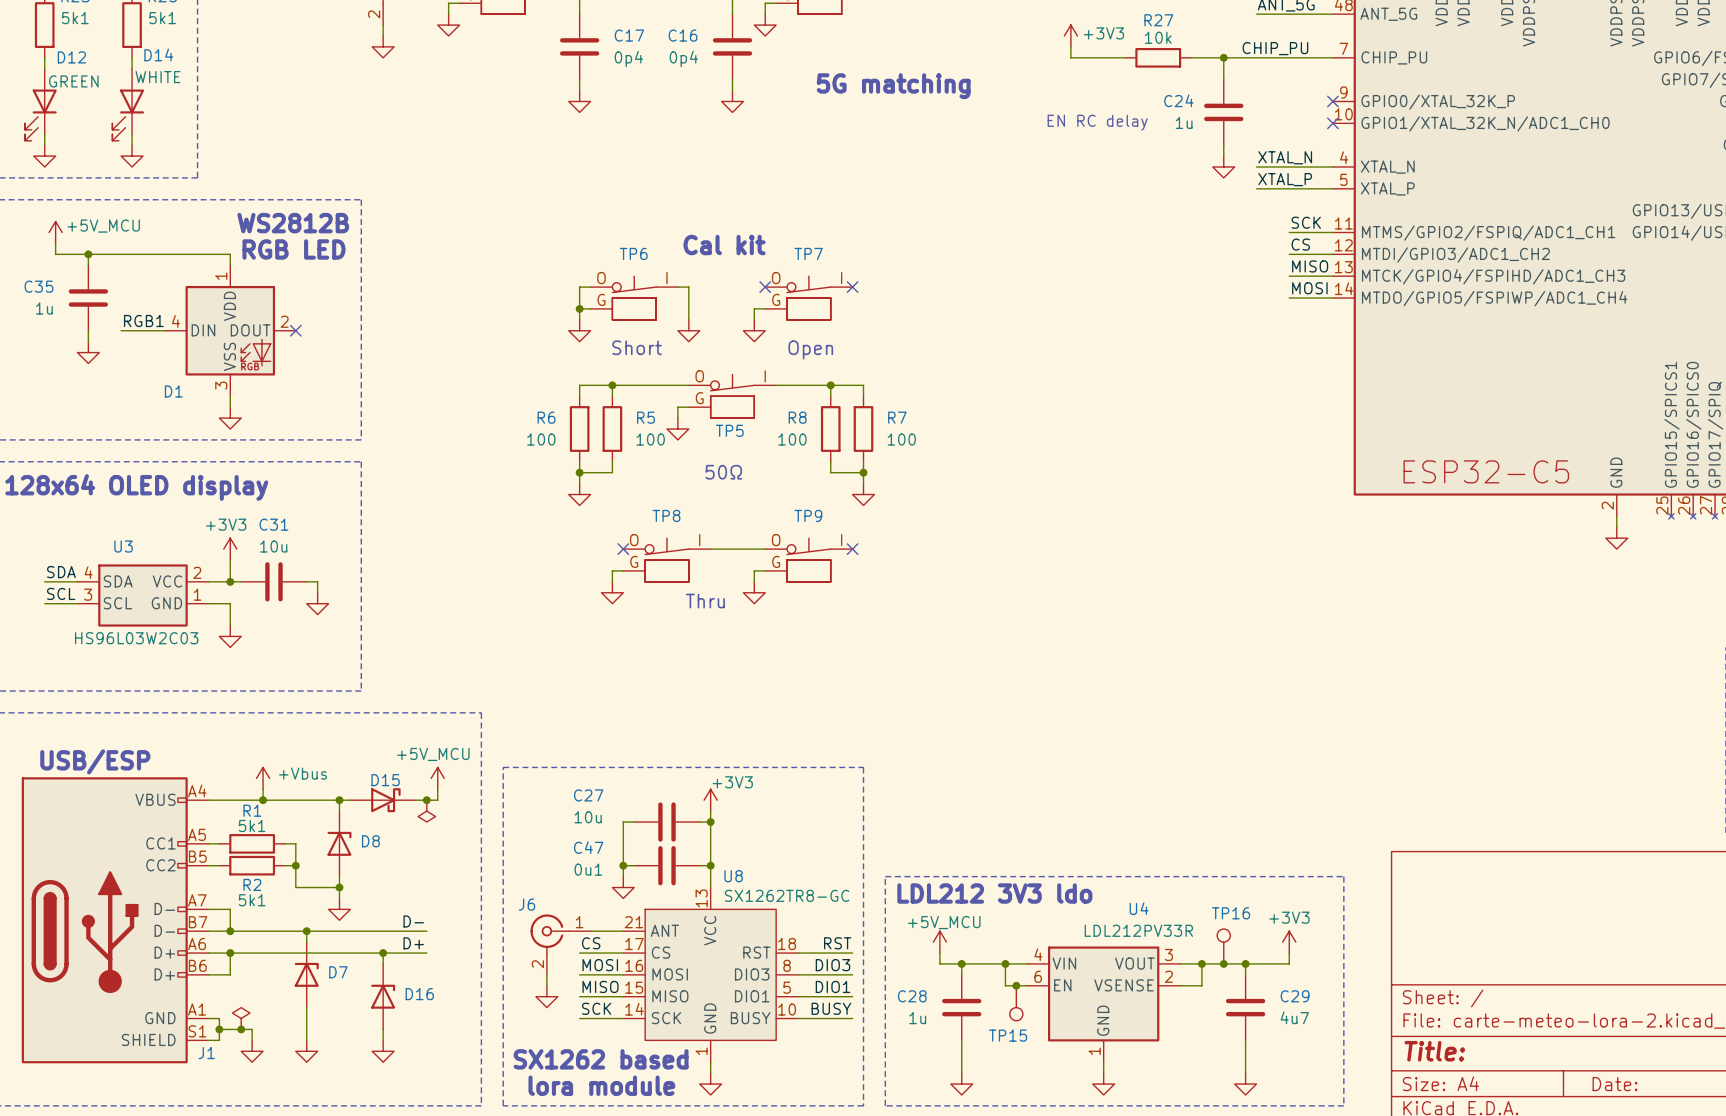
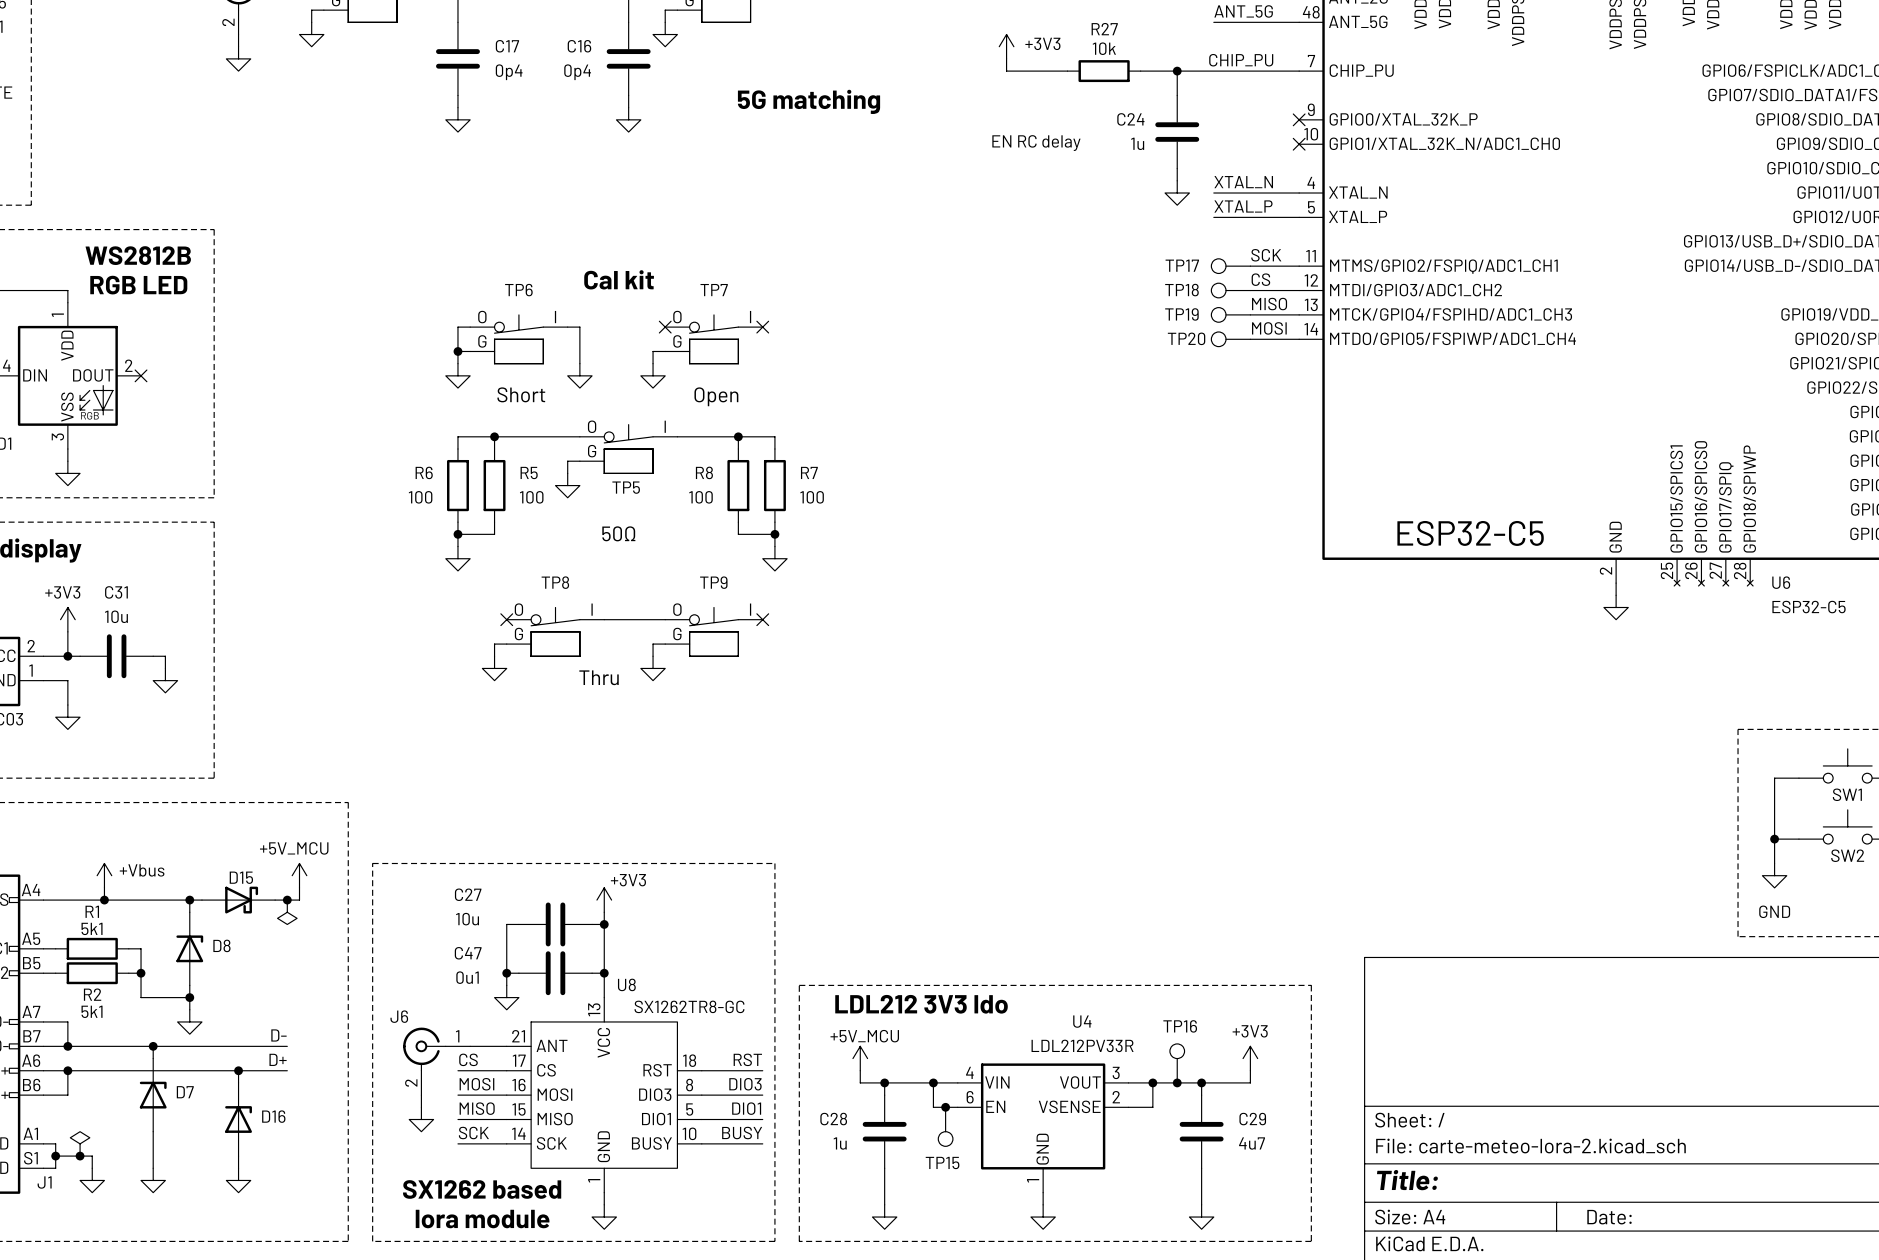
TP17: none -> (1230, 266)
TP18: none -> (1230, 290)
TP19: none -> (1230, 314)
TP20: none -> (1230, 339)

